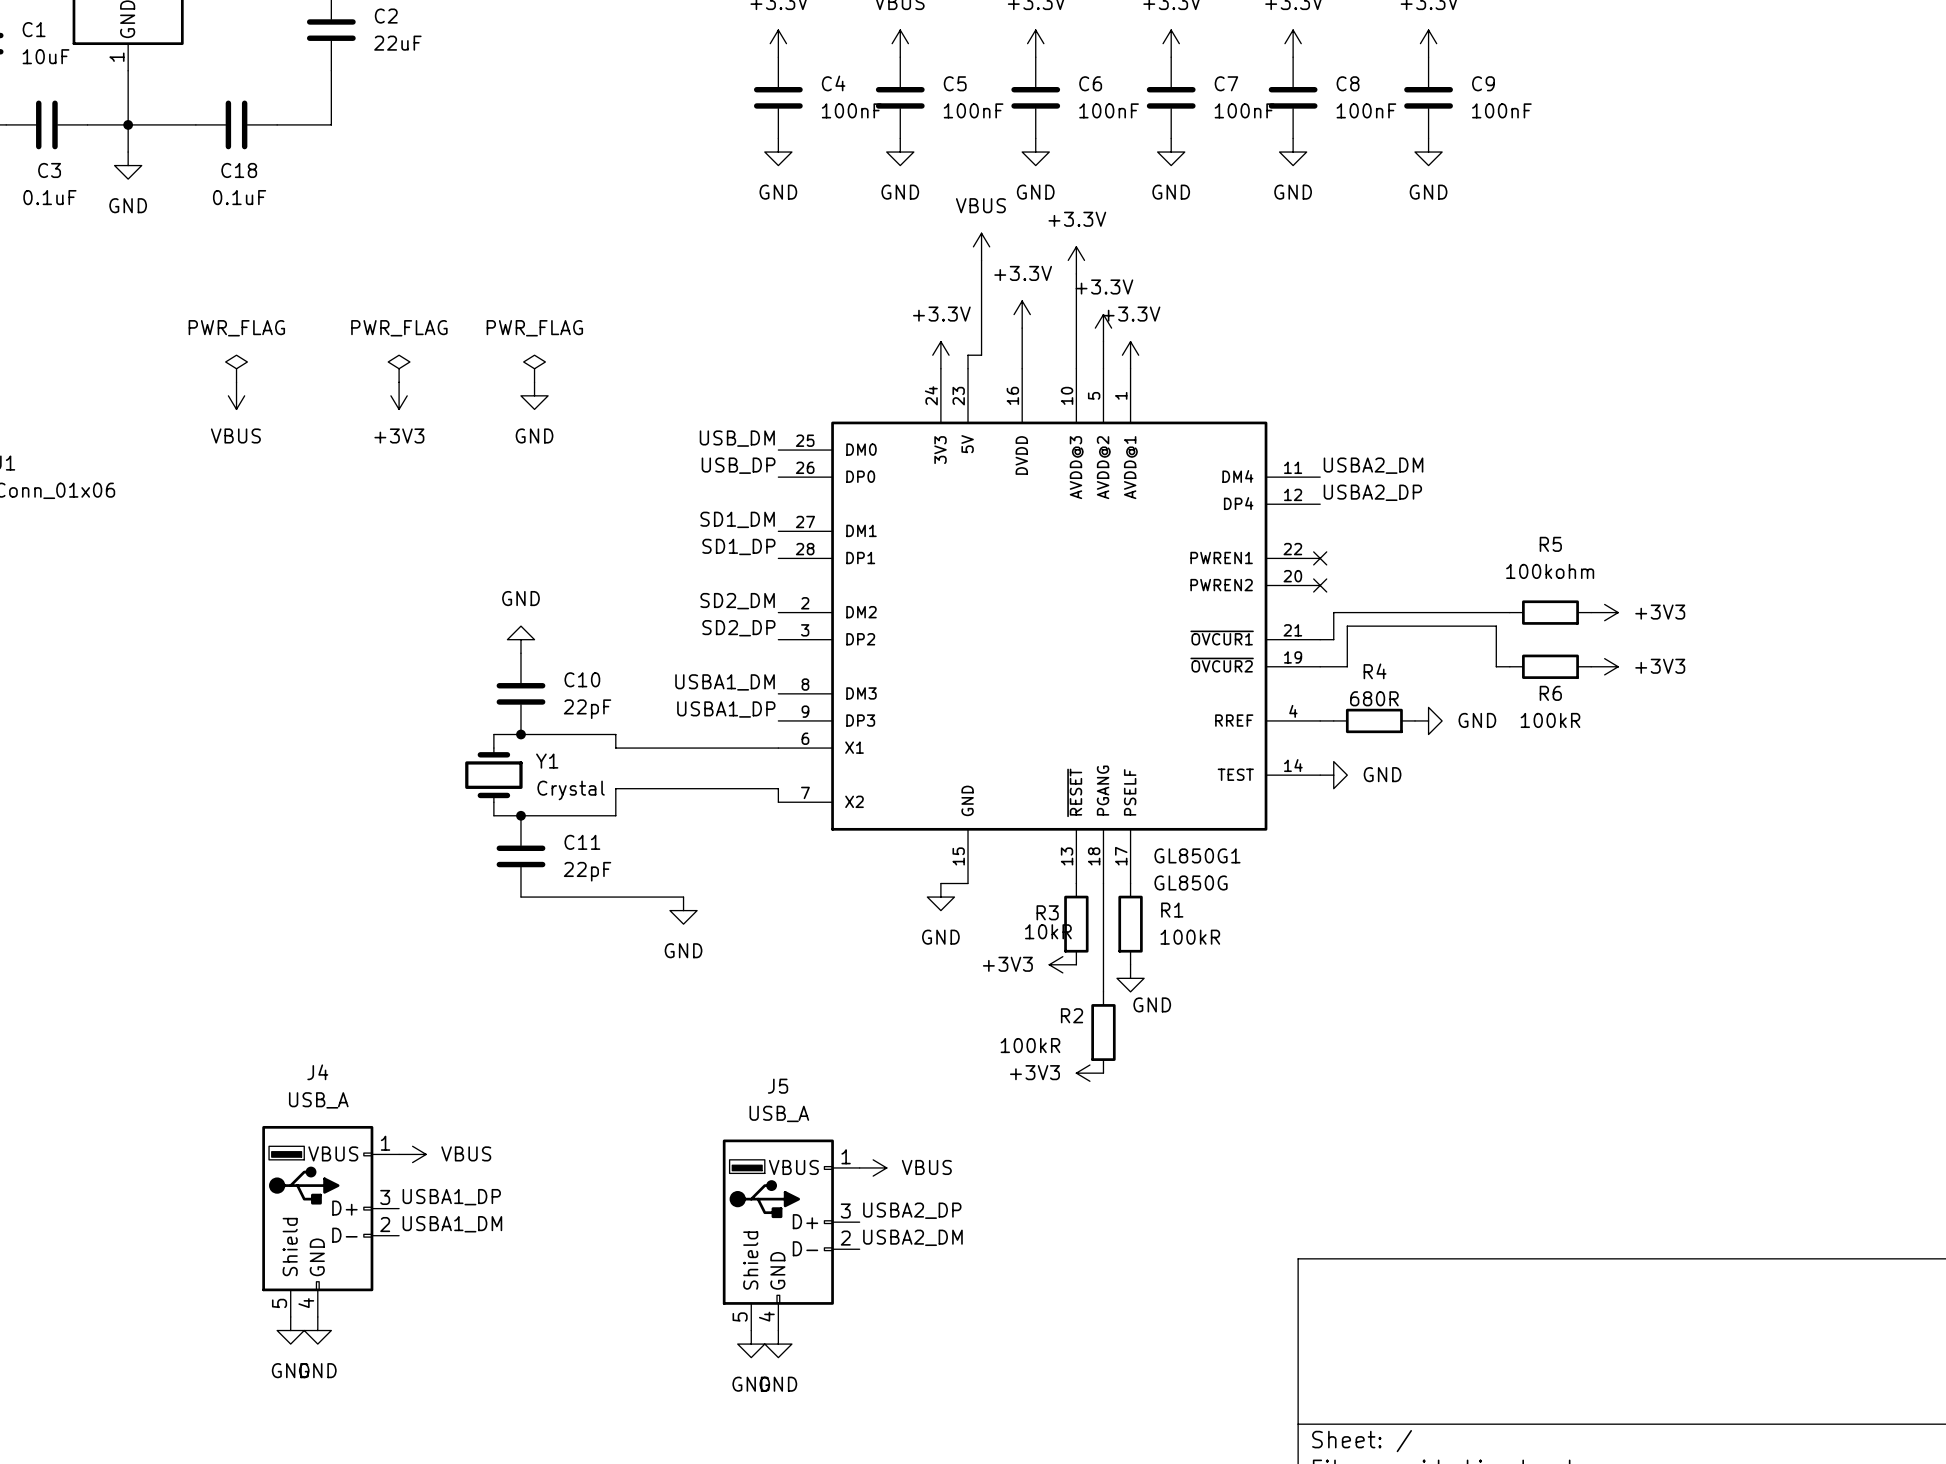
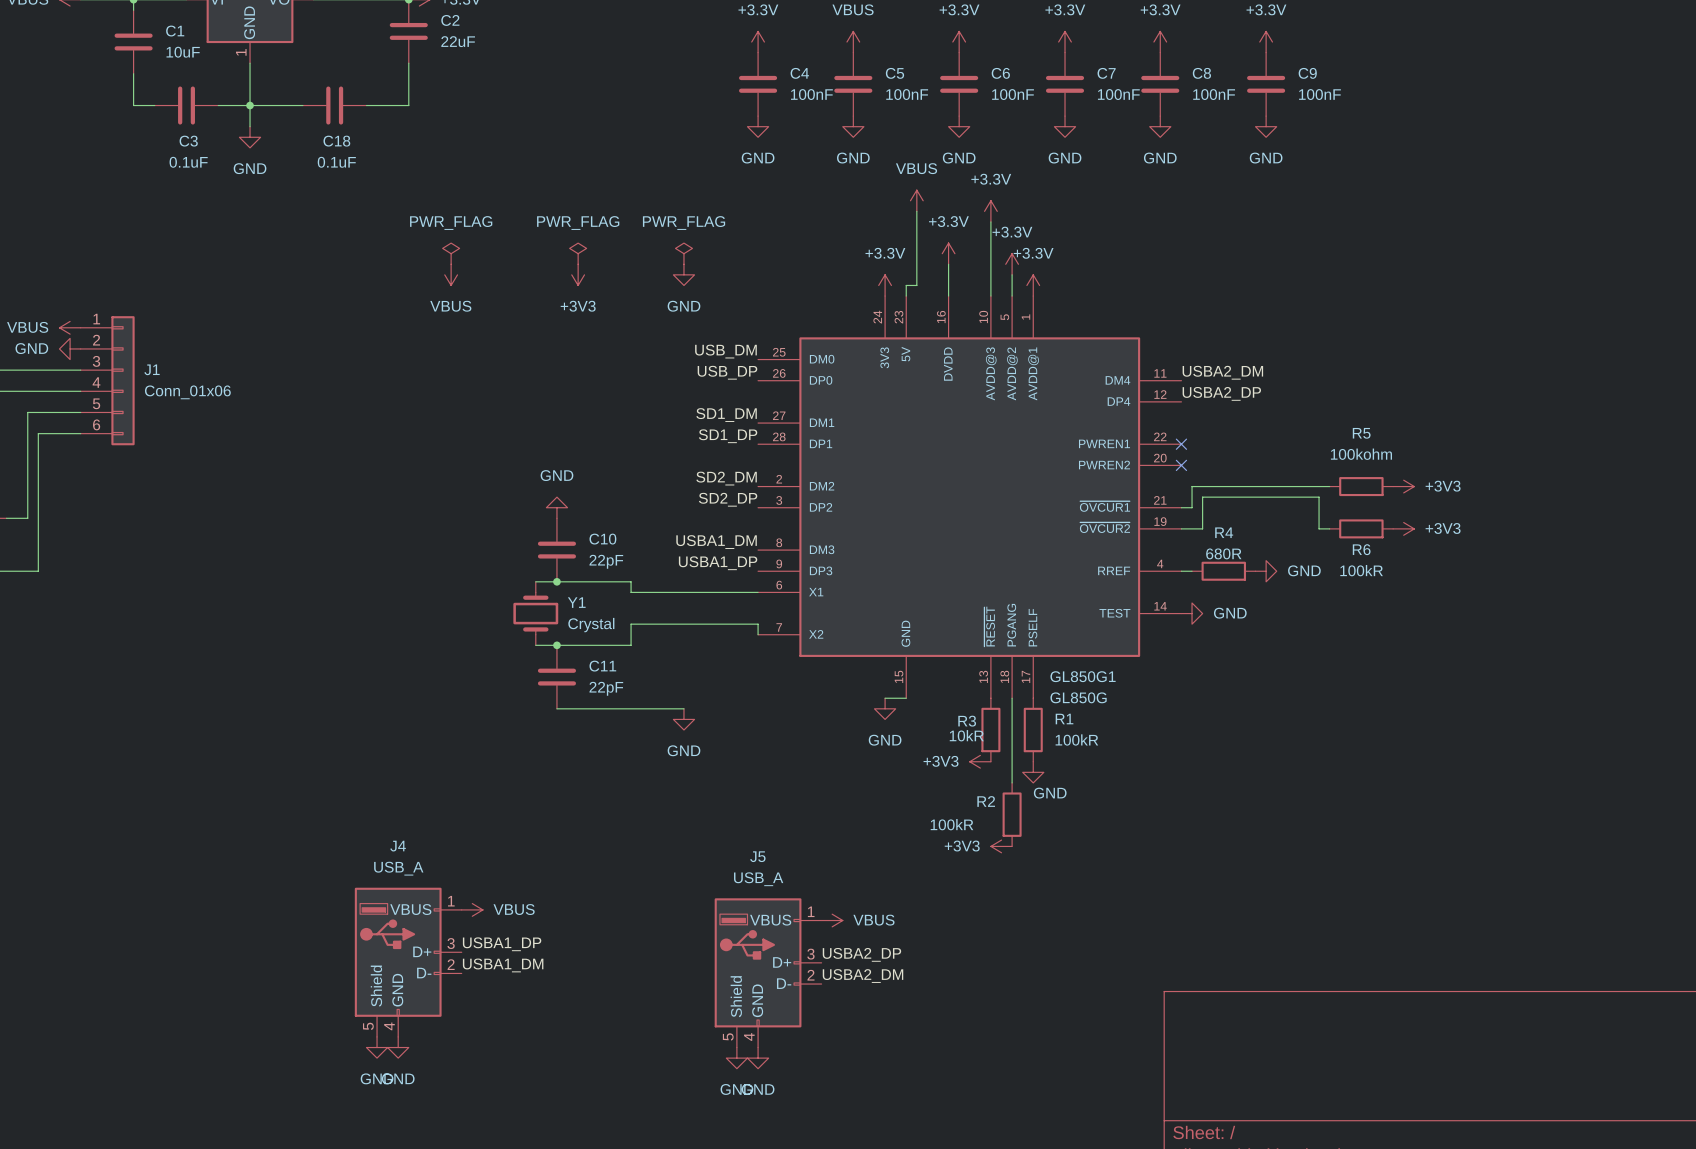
power symbol: none -> PWR_FLAG (683, 253)
power symbol: PWR_FLAG (236, 368) -> none
power symbol position: PWR_FLAG (399, 368) -> PWR_FLAG (451, 253)
power symbol position: PWR_FLAG (534, 368) -> PWR_FLAG (578, 253)
power symbol position: VBUS (236, 395) -> VBUS (451, 274)
power symbol position: +3V3 (399, 395) -> +3V3 (578, 274)
power symbol position: GND (534, 395) -> GND (683, 274)

